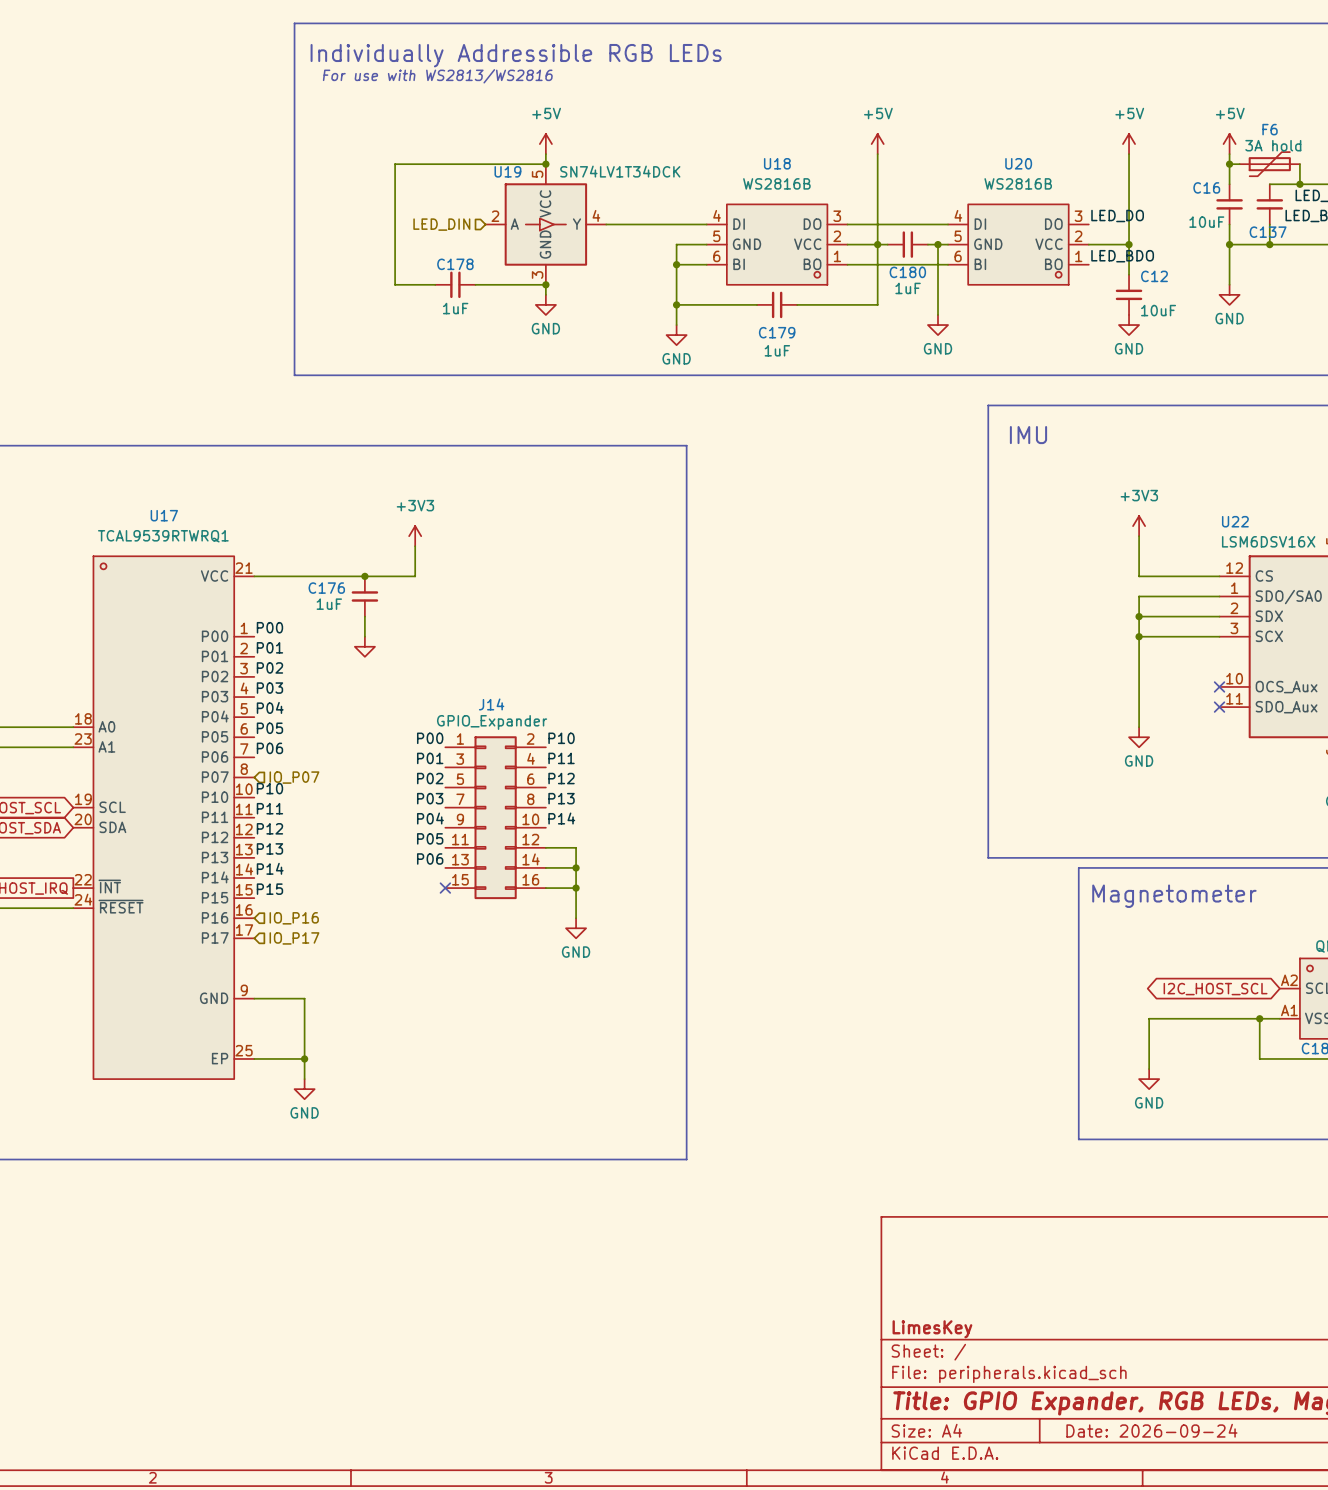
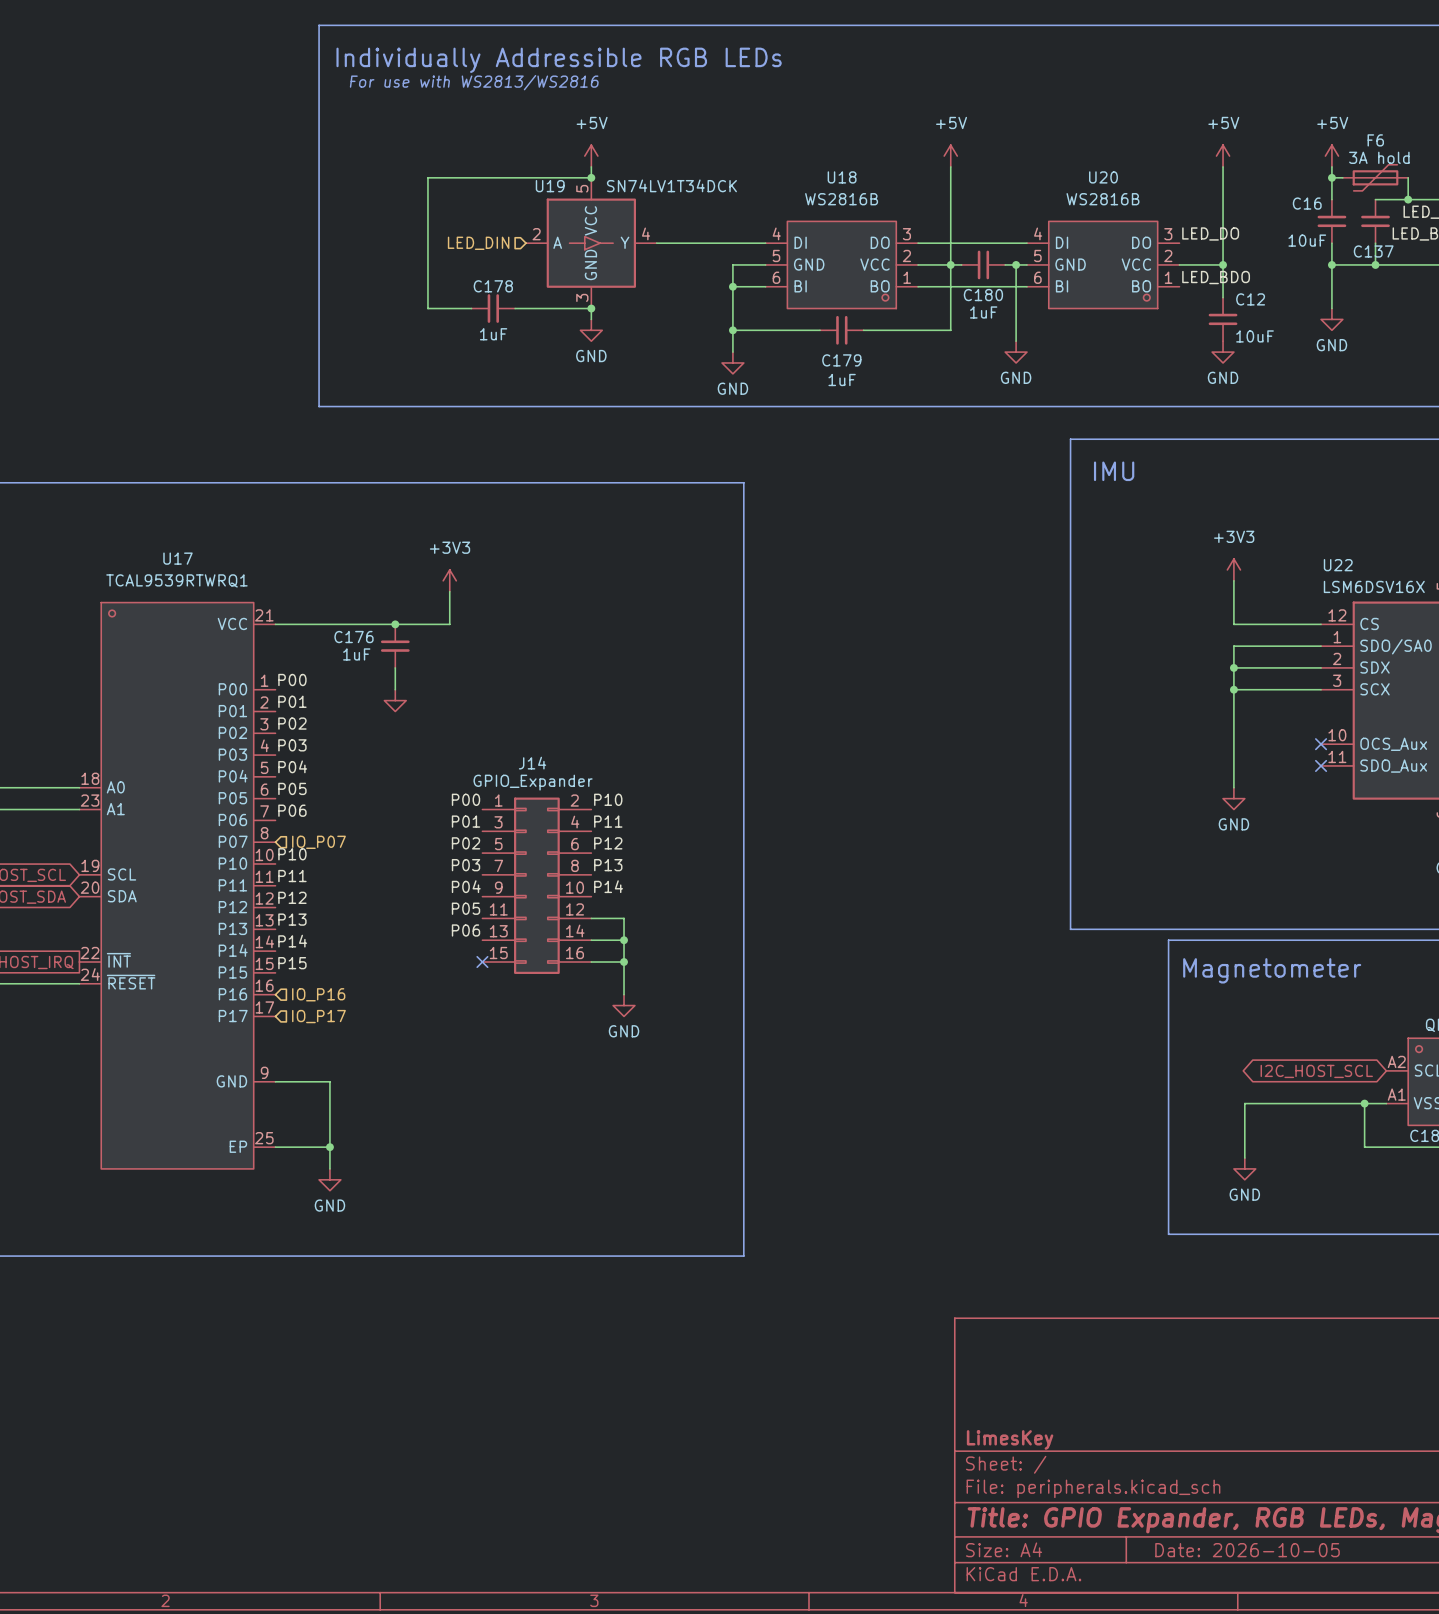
title block: Date: 2026-09-24 (1151, 1430) -> Date: 2026-10-05 (1247, 1550)

